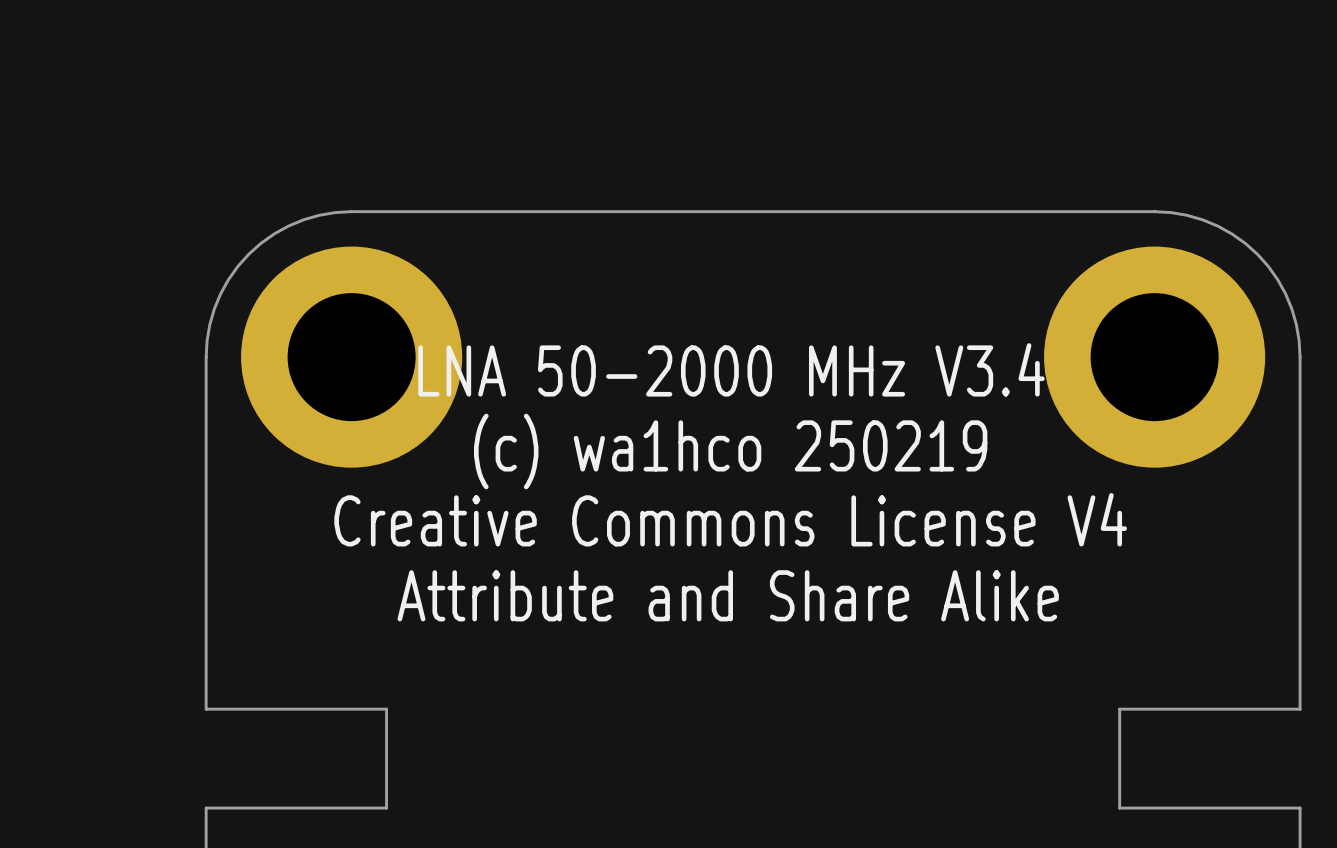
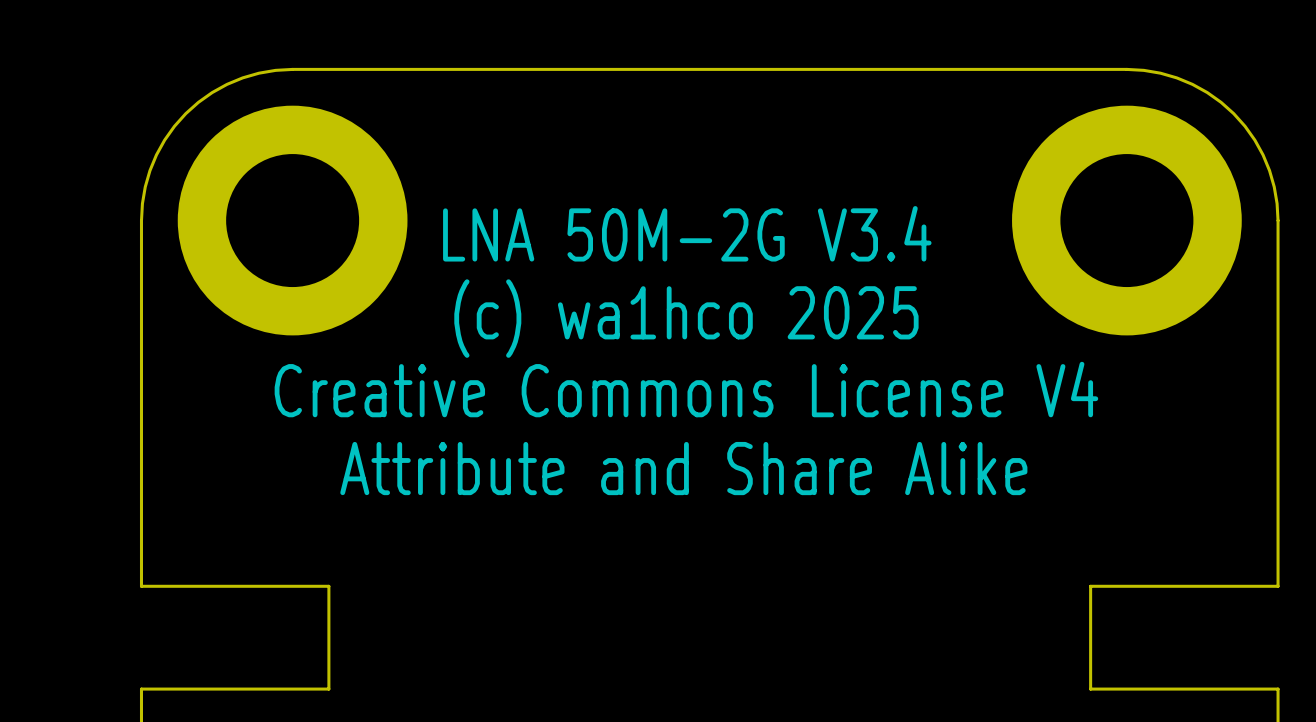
text: LNA 50-2000 MHz V3.4 (731, 369) -> LNA 50M-2G V3.4 (687, 233)
text: (c) wa1hco 250219 (730, 451) -> (c) wa1hco 2025 (686, 318)

